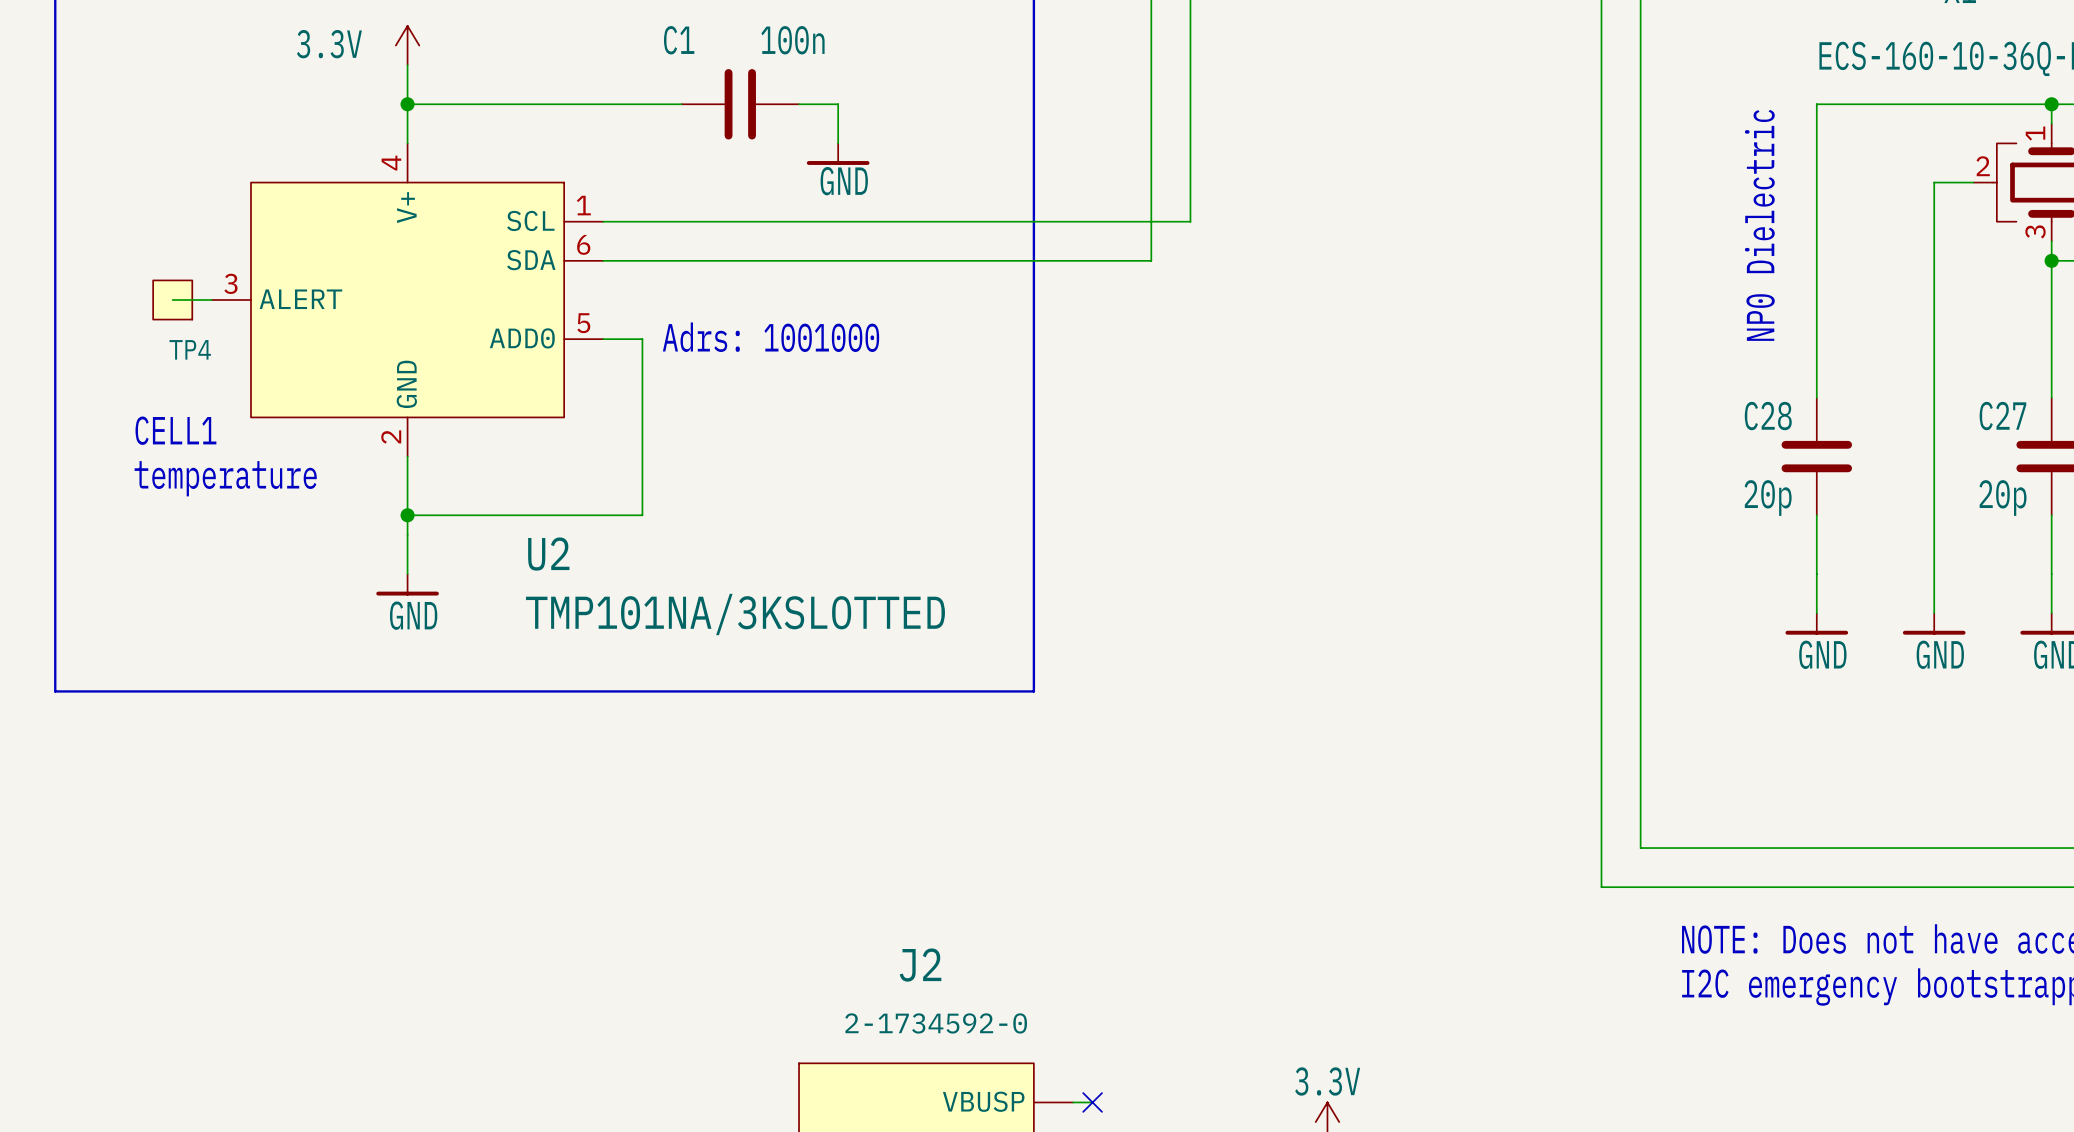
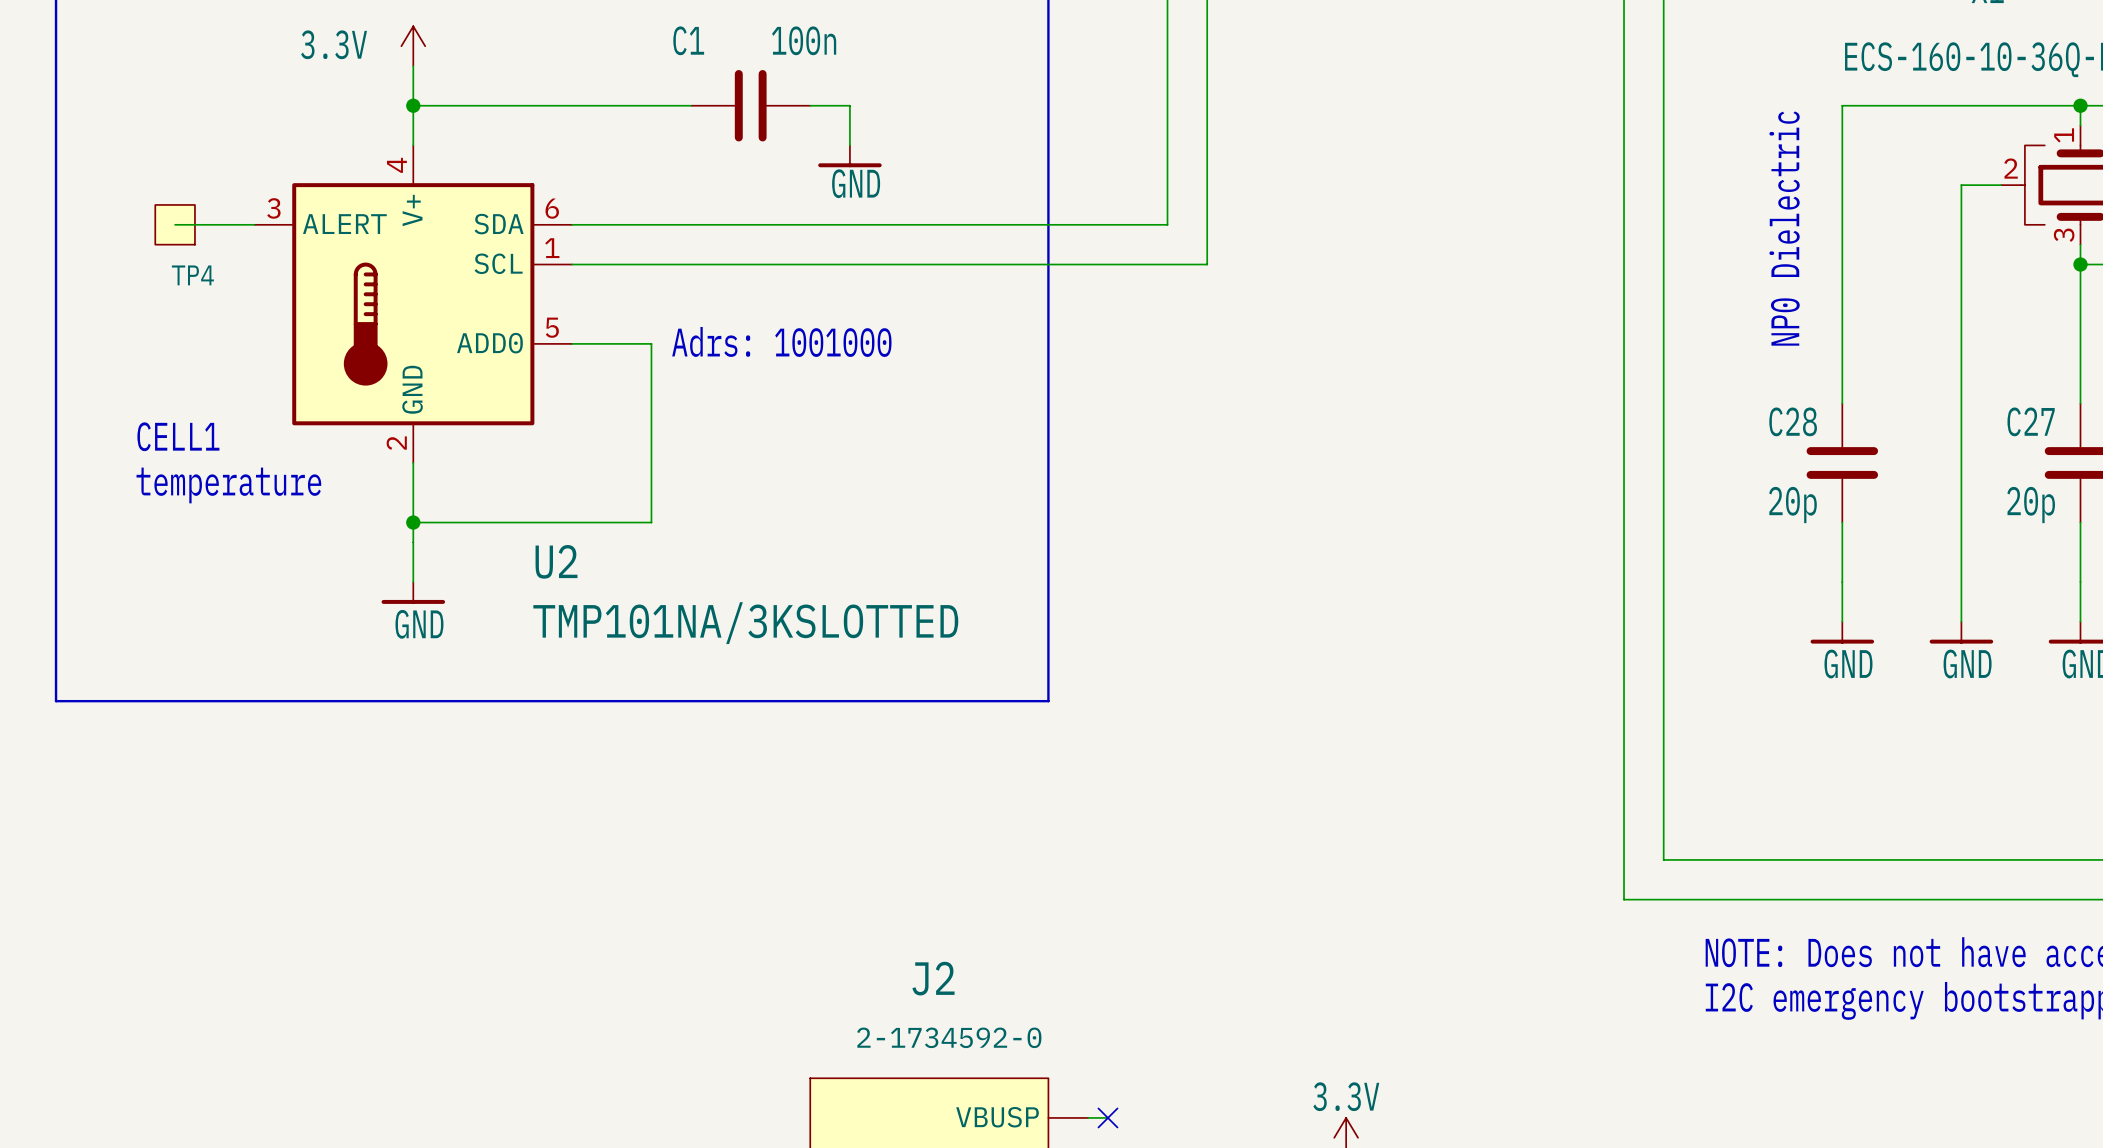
U2 symbol: [211, 143, 604, 457] -> [254, 145, 573, 463]
wire: none -> (175, 224) (254, 224)
wire: (1190, 221) (1151, 221) (1151, 260) -> (1207, 224) (1207, 264) (1167, 264)
wire: (172, 299) (211, 299) -> none
TP4 position: (172, 299) -> (175, 224)

